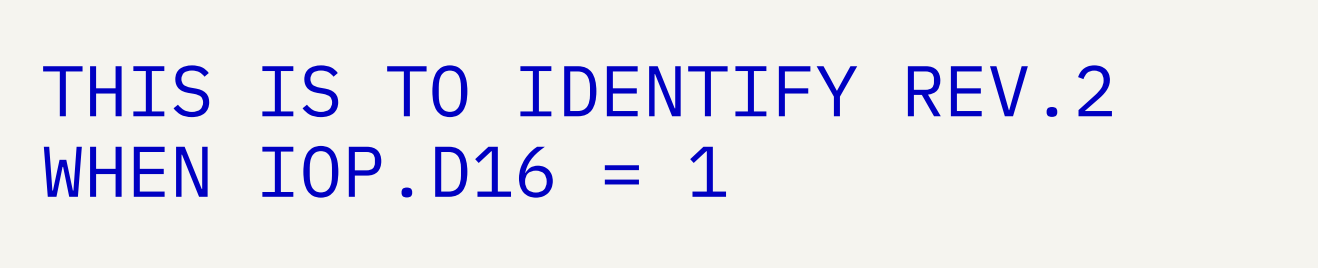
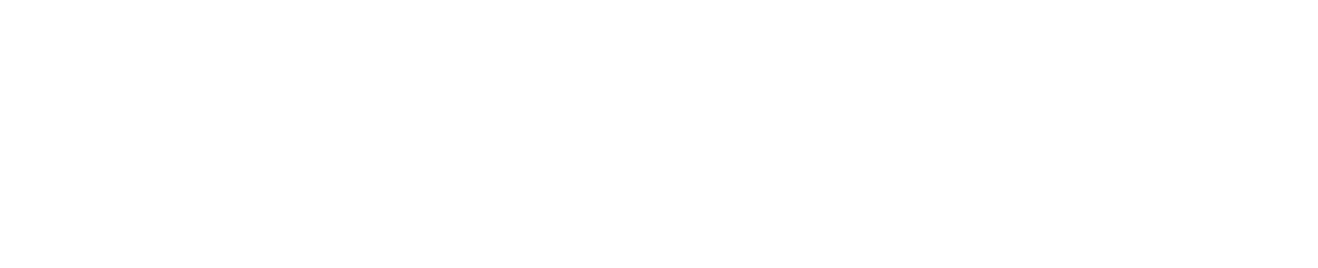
text: THIS IS TO IDENTIFY REV.2 (577, 91) -> none
text: WHEN IOP.D16 = 1 (384, 171) -> none

